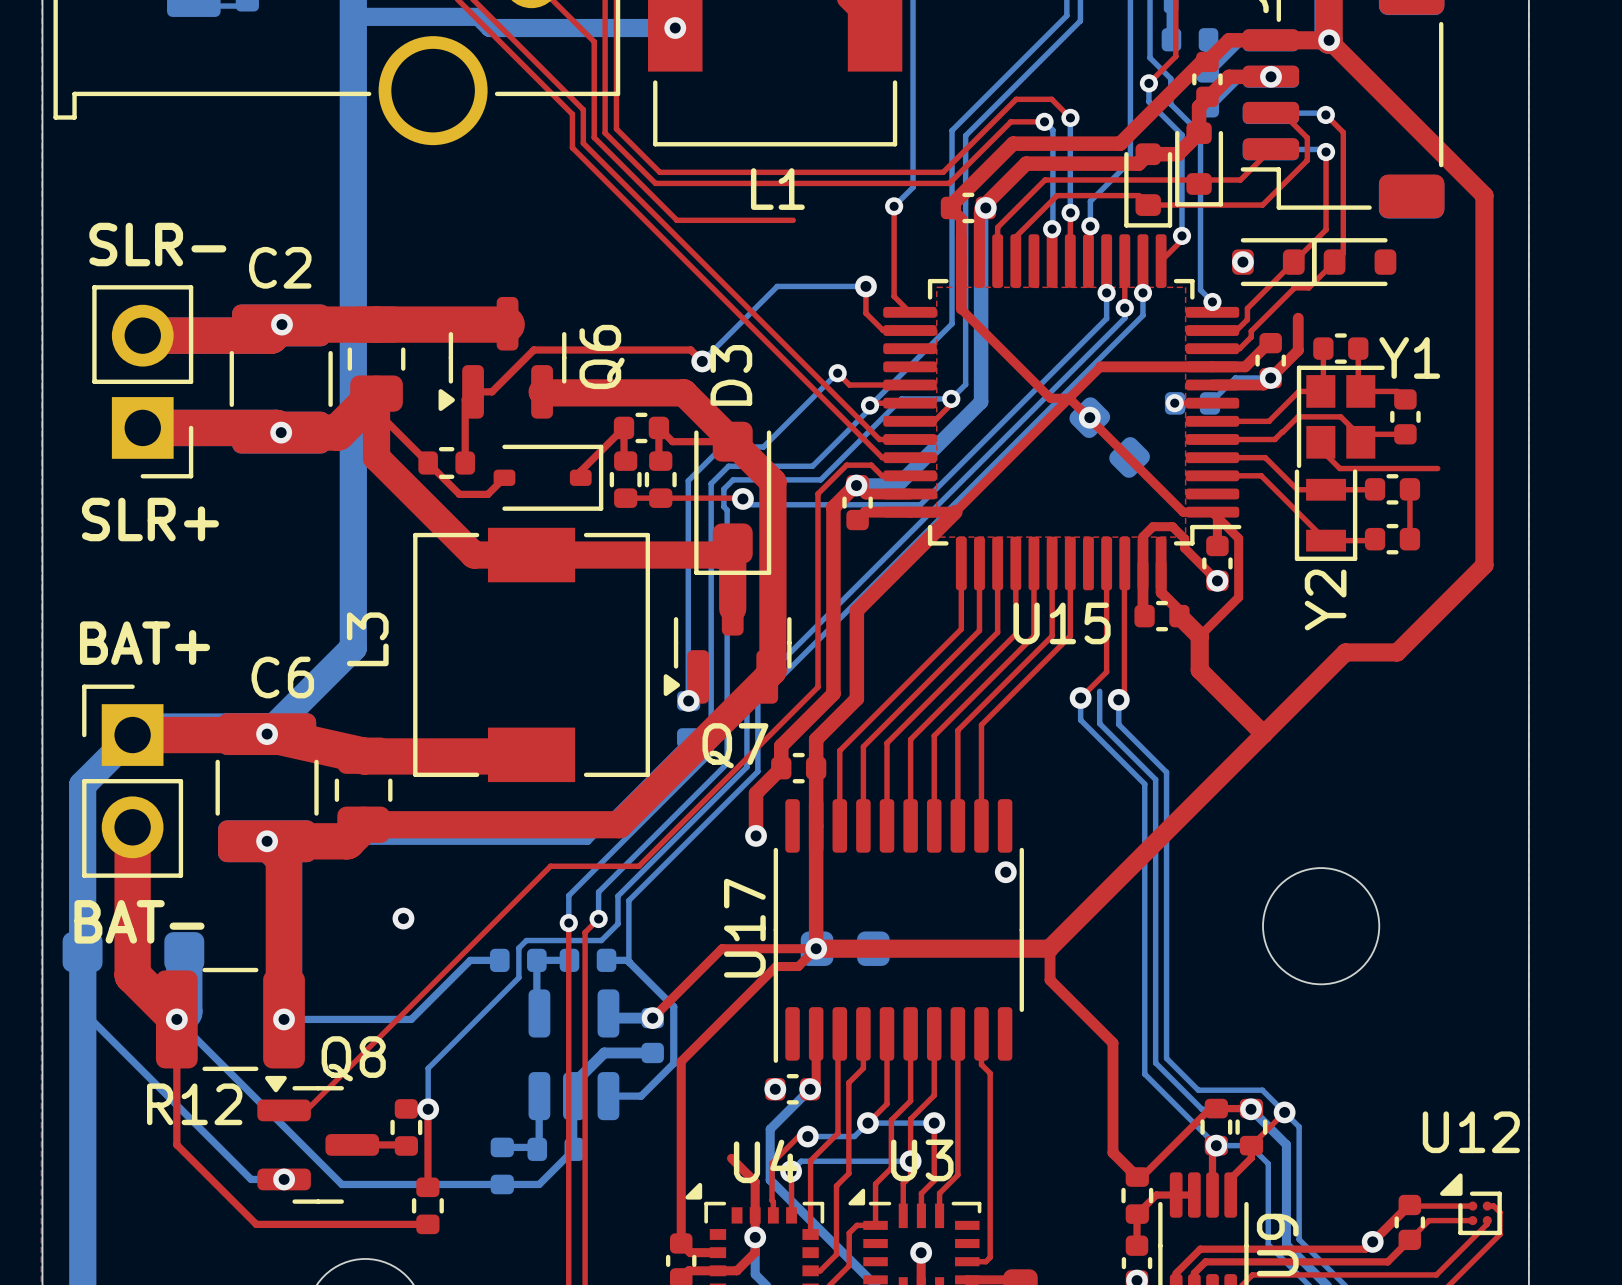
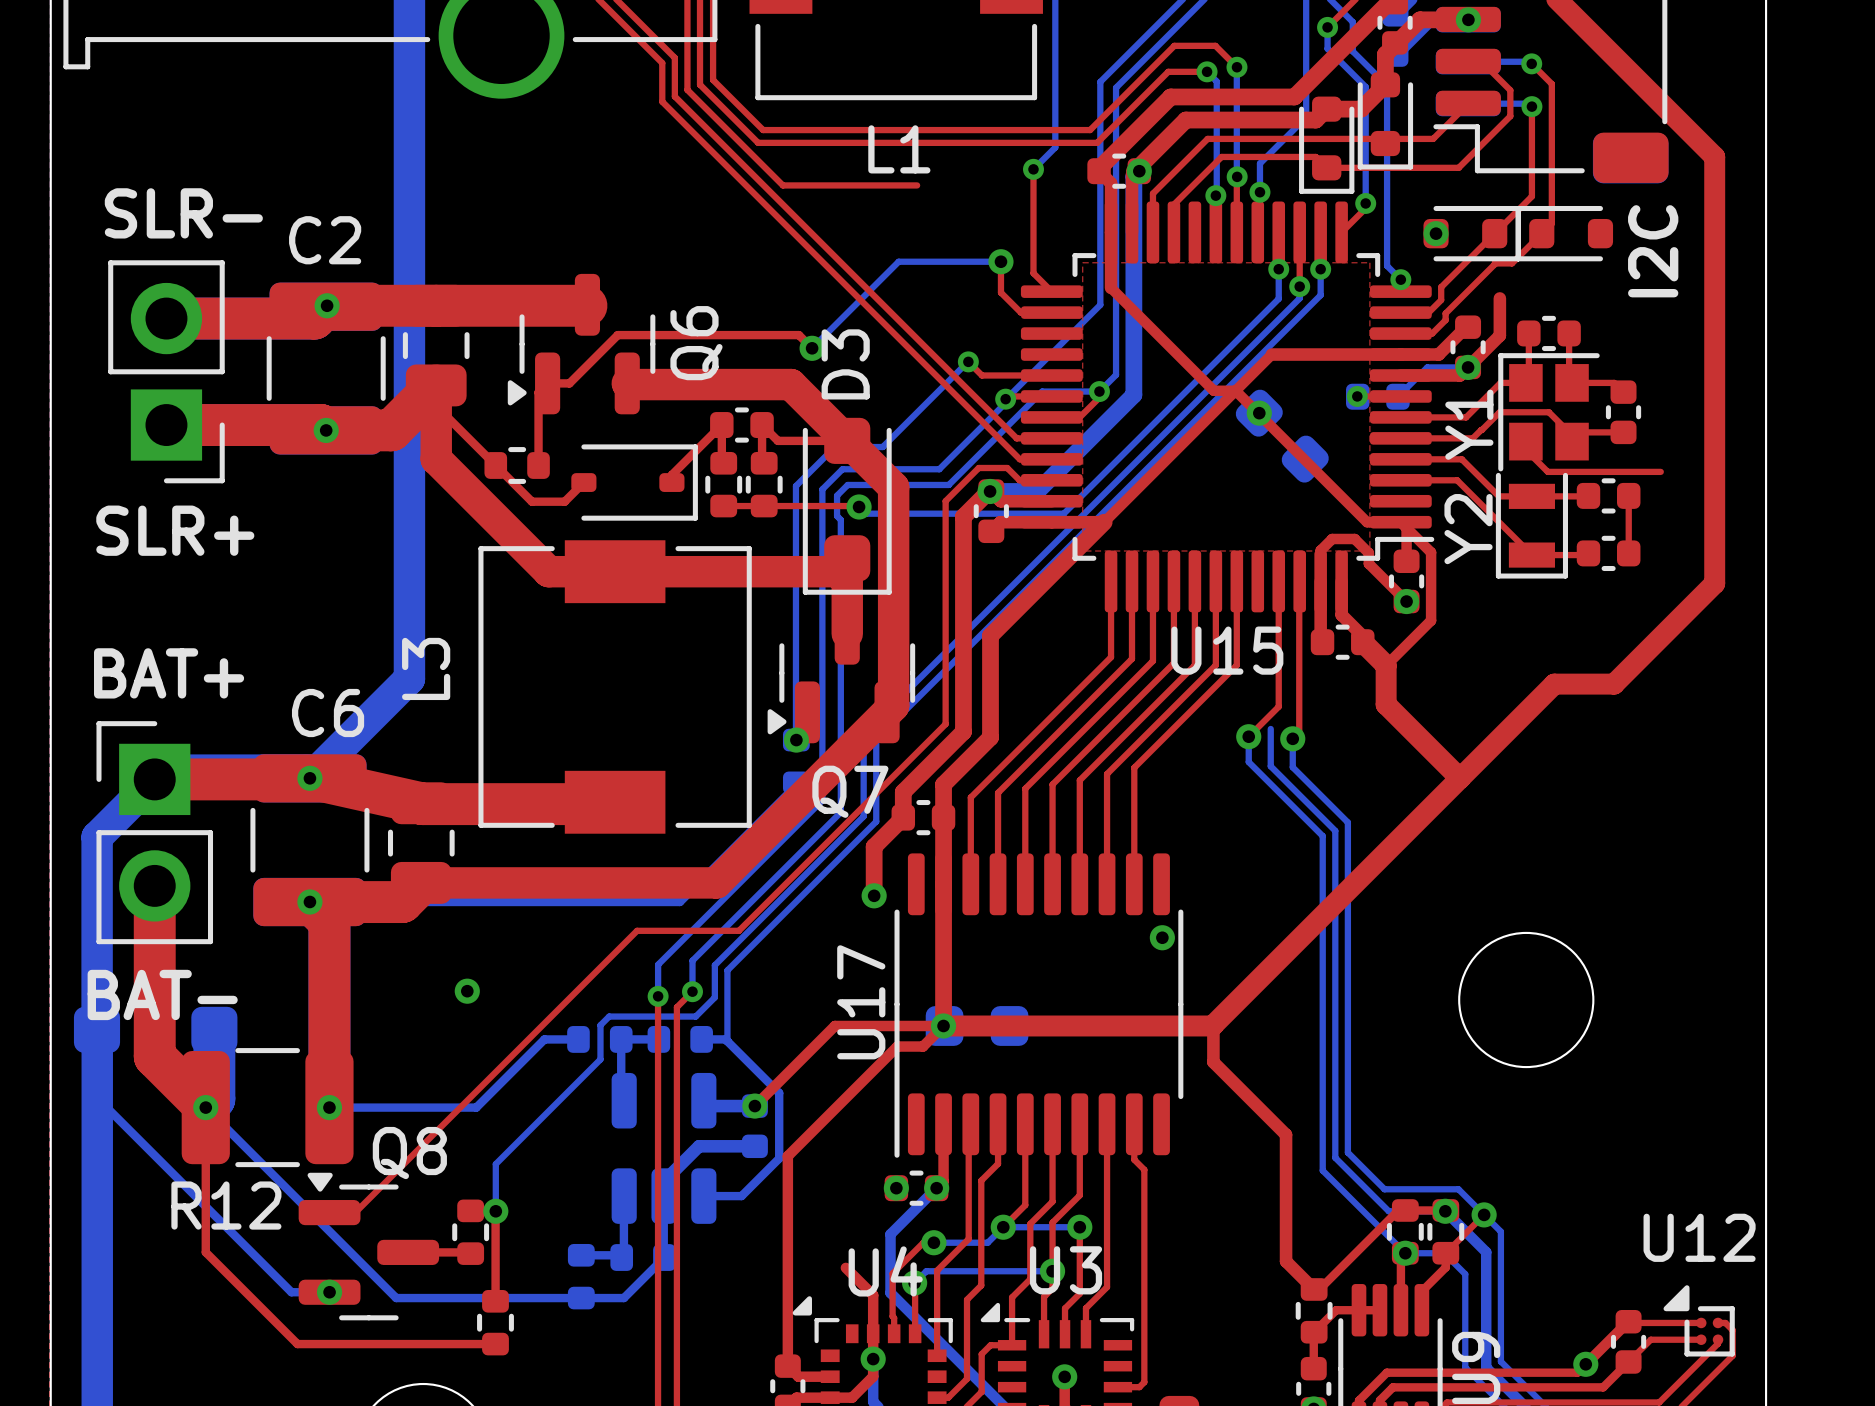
text: none -> I2C (1653, 251)
Y1 name rotation: 0° (1409, 357) -> 90° counterclockwise (1469, 424)
Y1 name position: Y1 (1409, 357) -> Y1 (1469, 424)
Y2 name position: Y2 (1325, 599) -> Y2 (1468, 529)

